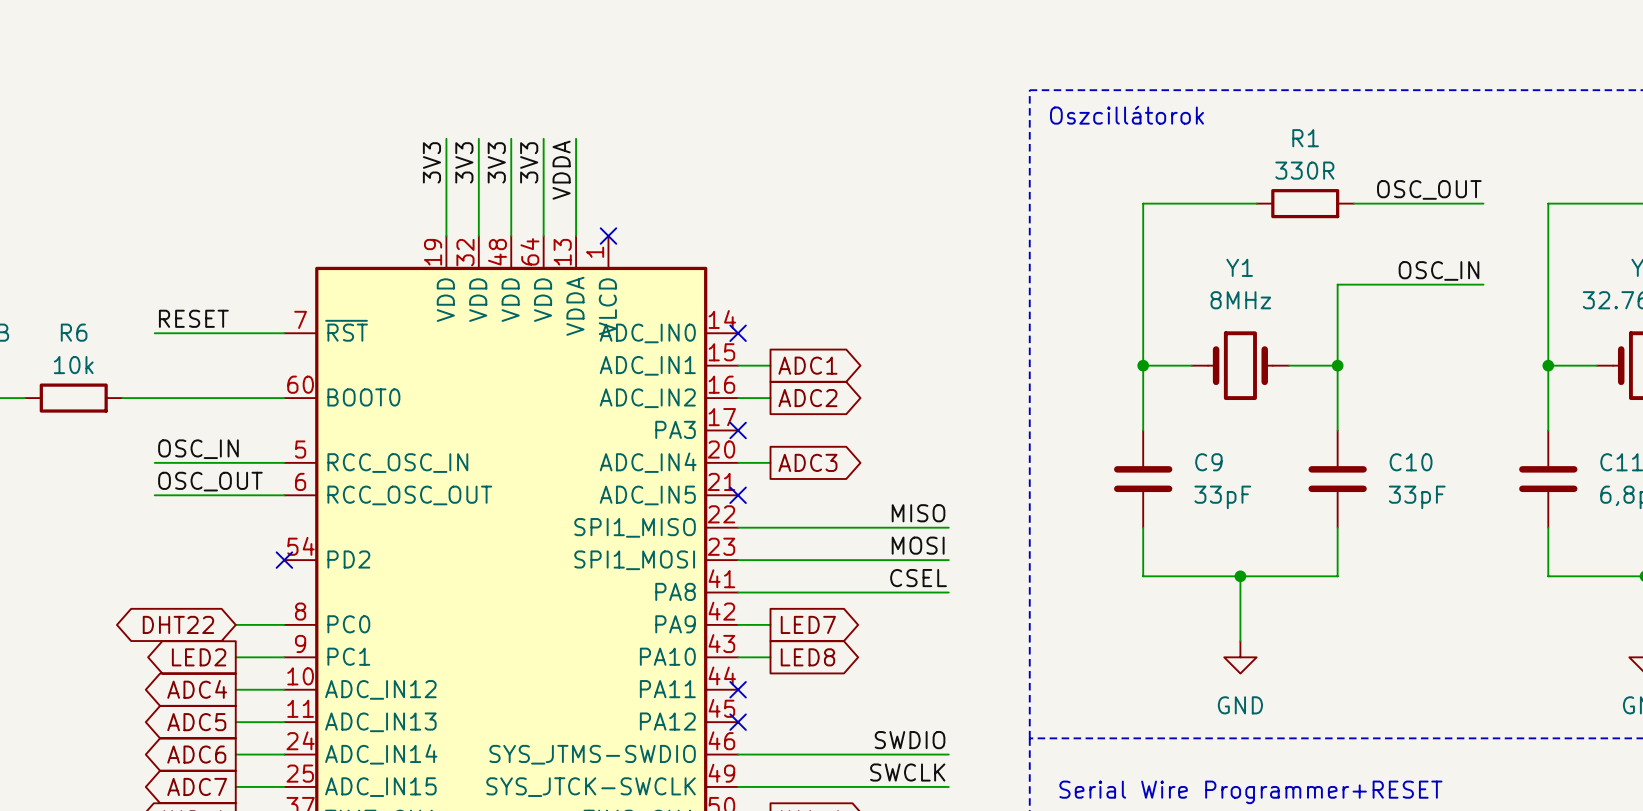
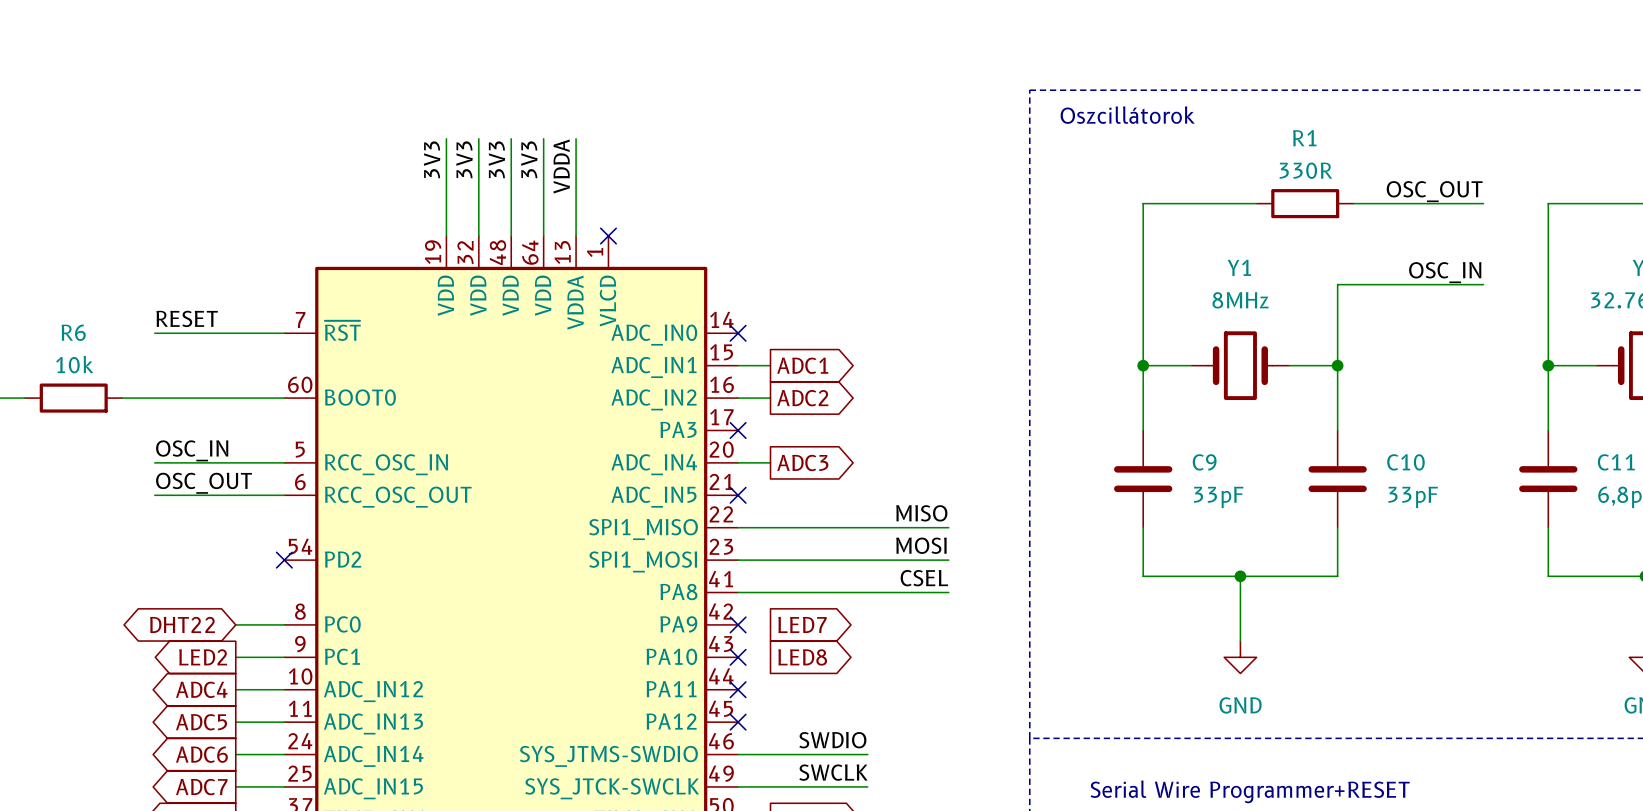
wire: (738, 624) (770, 624) -> none
no-connect mark: none -> (738, 624)
wire: (738, 657) (770, 657) -> none
no-connect mark: none -> (738, 657)
label position: SWDIO (910, 740) -> SWDIO (832, 740)
wire: (867, 754) (948, 754) -> none
label position: SWCLK (907, 772) -> SWCLK (833, 772)
wire: (867, 786) (948, 786) -> none

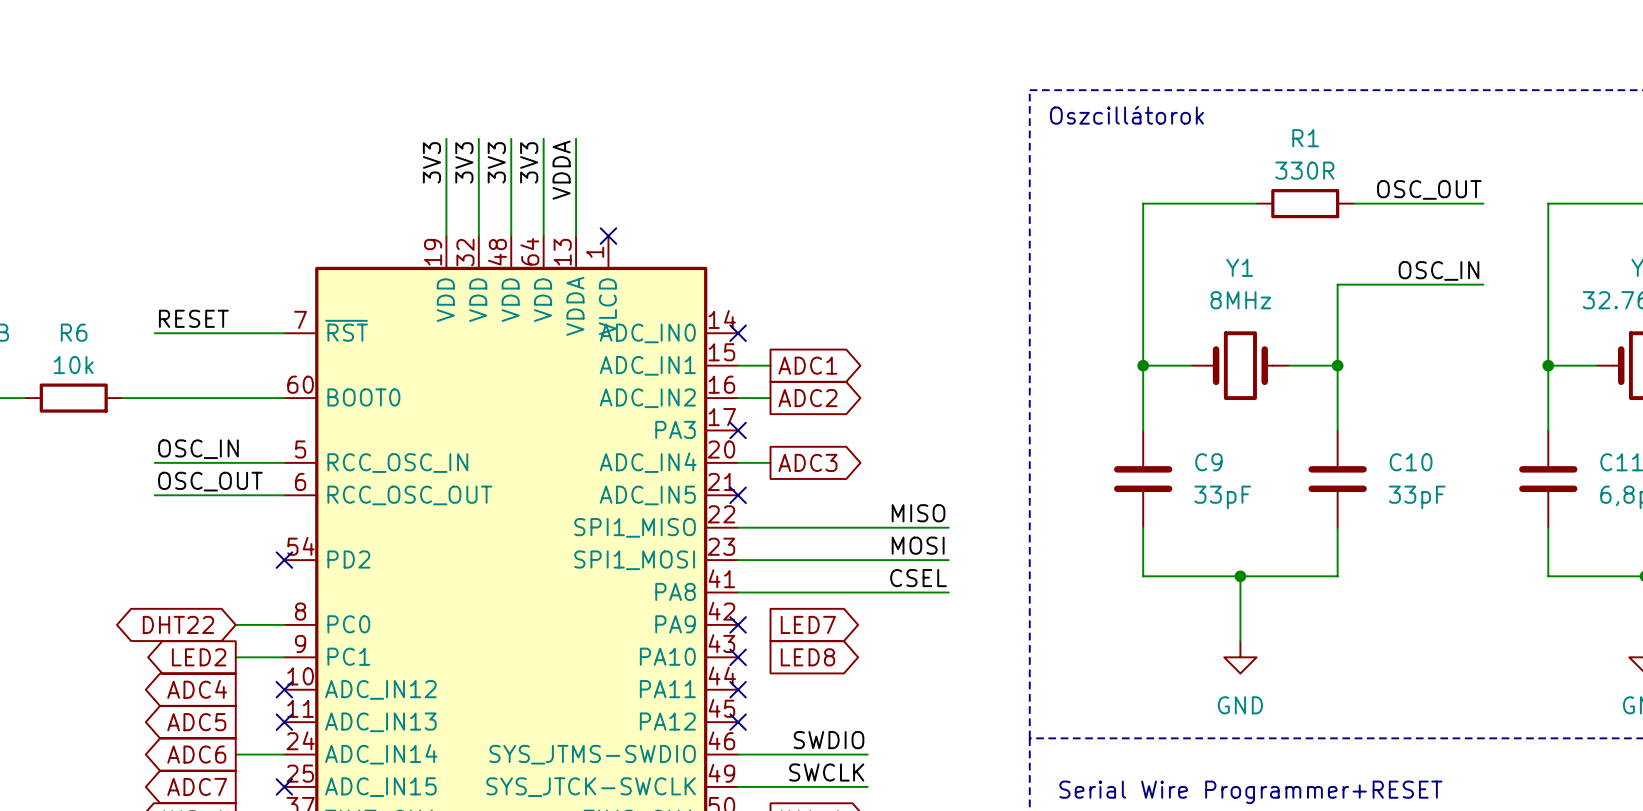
wire: (235, 689) (284, 689) -> none
no-connect mark: none -> (284, 689)
wire: (235, 722) (284, 722) -> none
no-connect mark: none -> (284, 722)
wire: (235, 786) (284, 786) -> none
no-connect mark: none -> (284, 786)

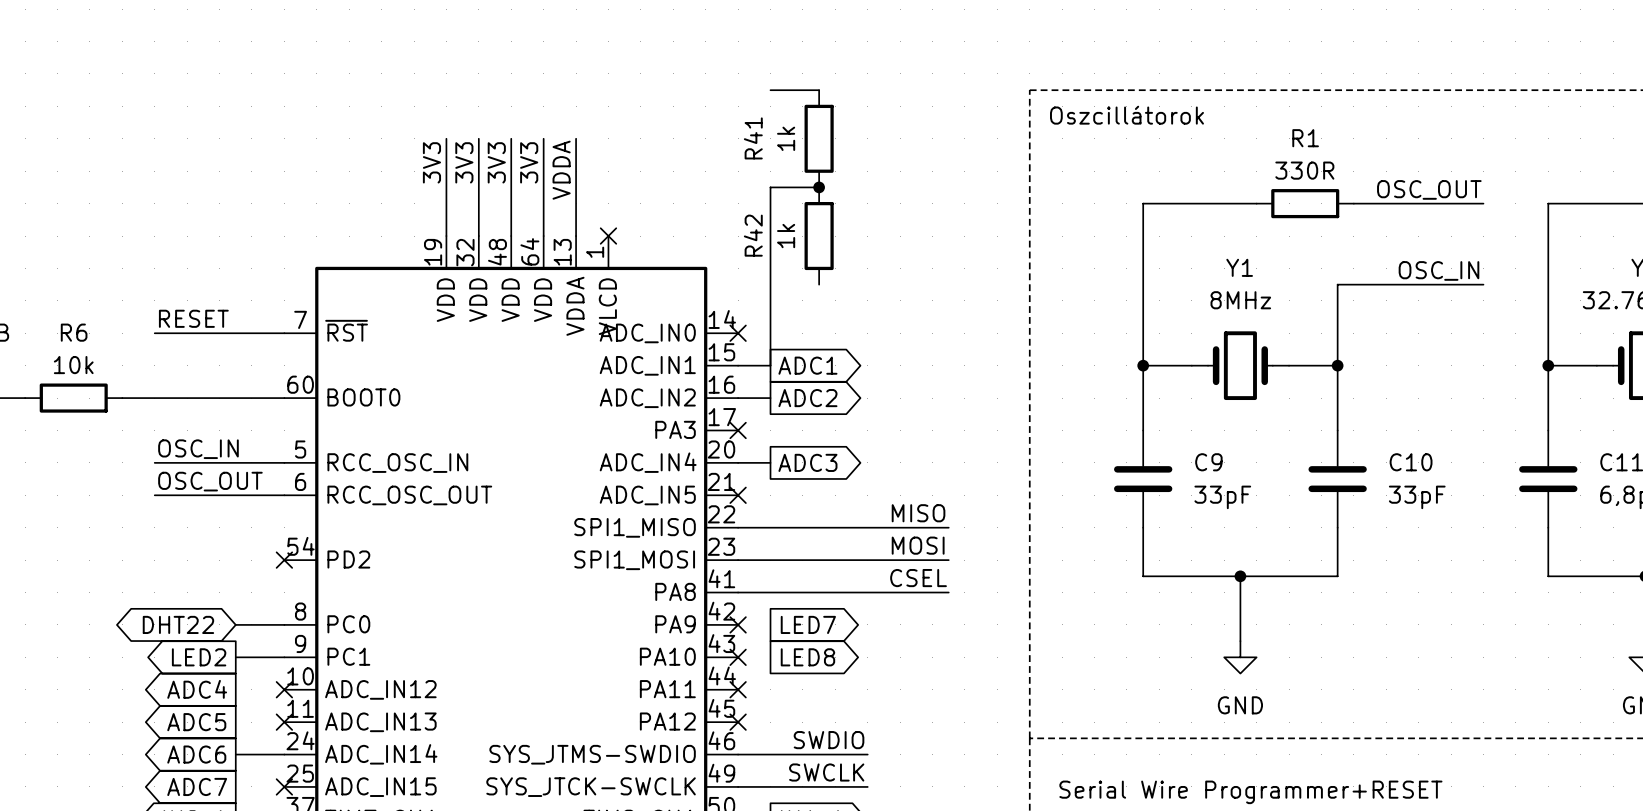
wire: none -> (770, 90) (819, 90)
R41: none -> 1k (819, 138)
wire: none -> (819, 187) (770, 187) (770, 365)
junction: none -> (819, 187)
R42: none -> 1k (819, 236)

